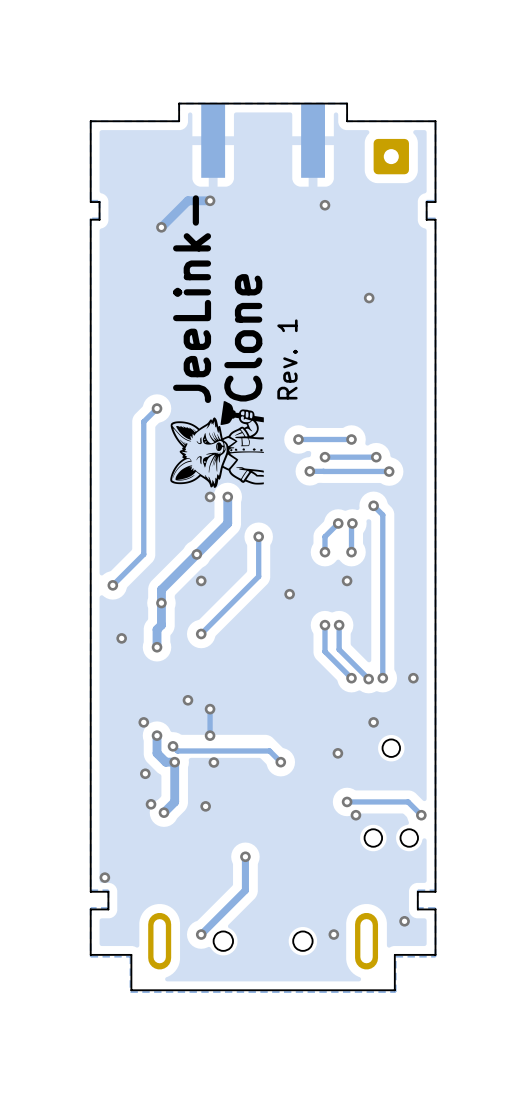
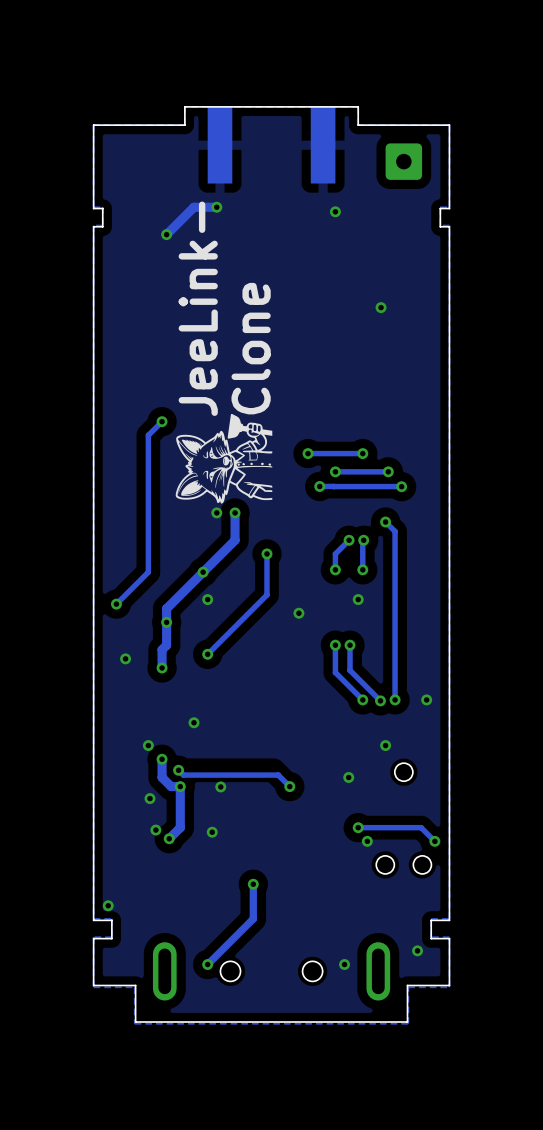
text: Rev. 1 (287, 359) -> none
track: (210, 709) (210, 735) -> none
via: (210, 709) -> none
via: (210, 735) -> none

